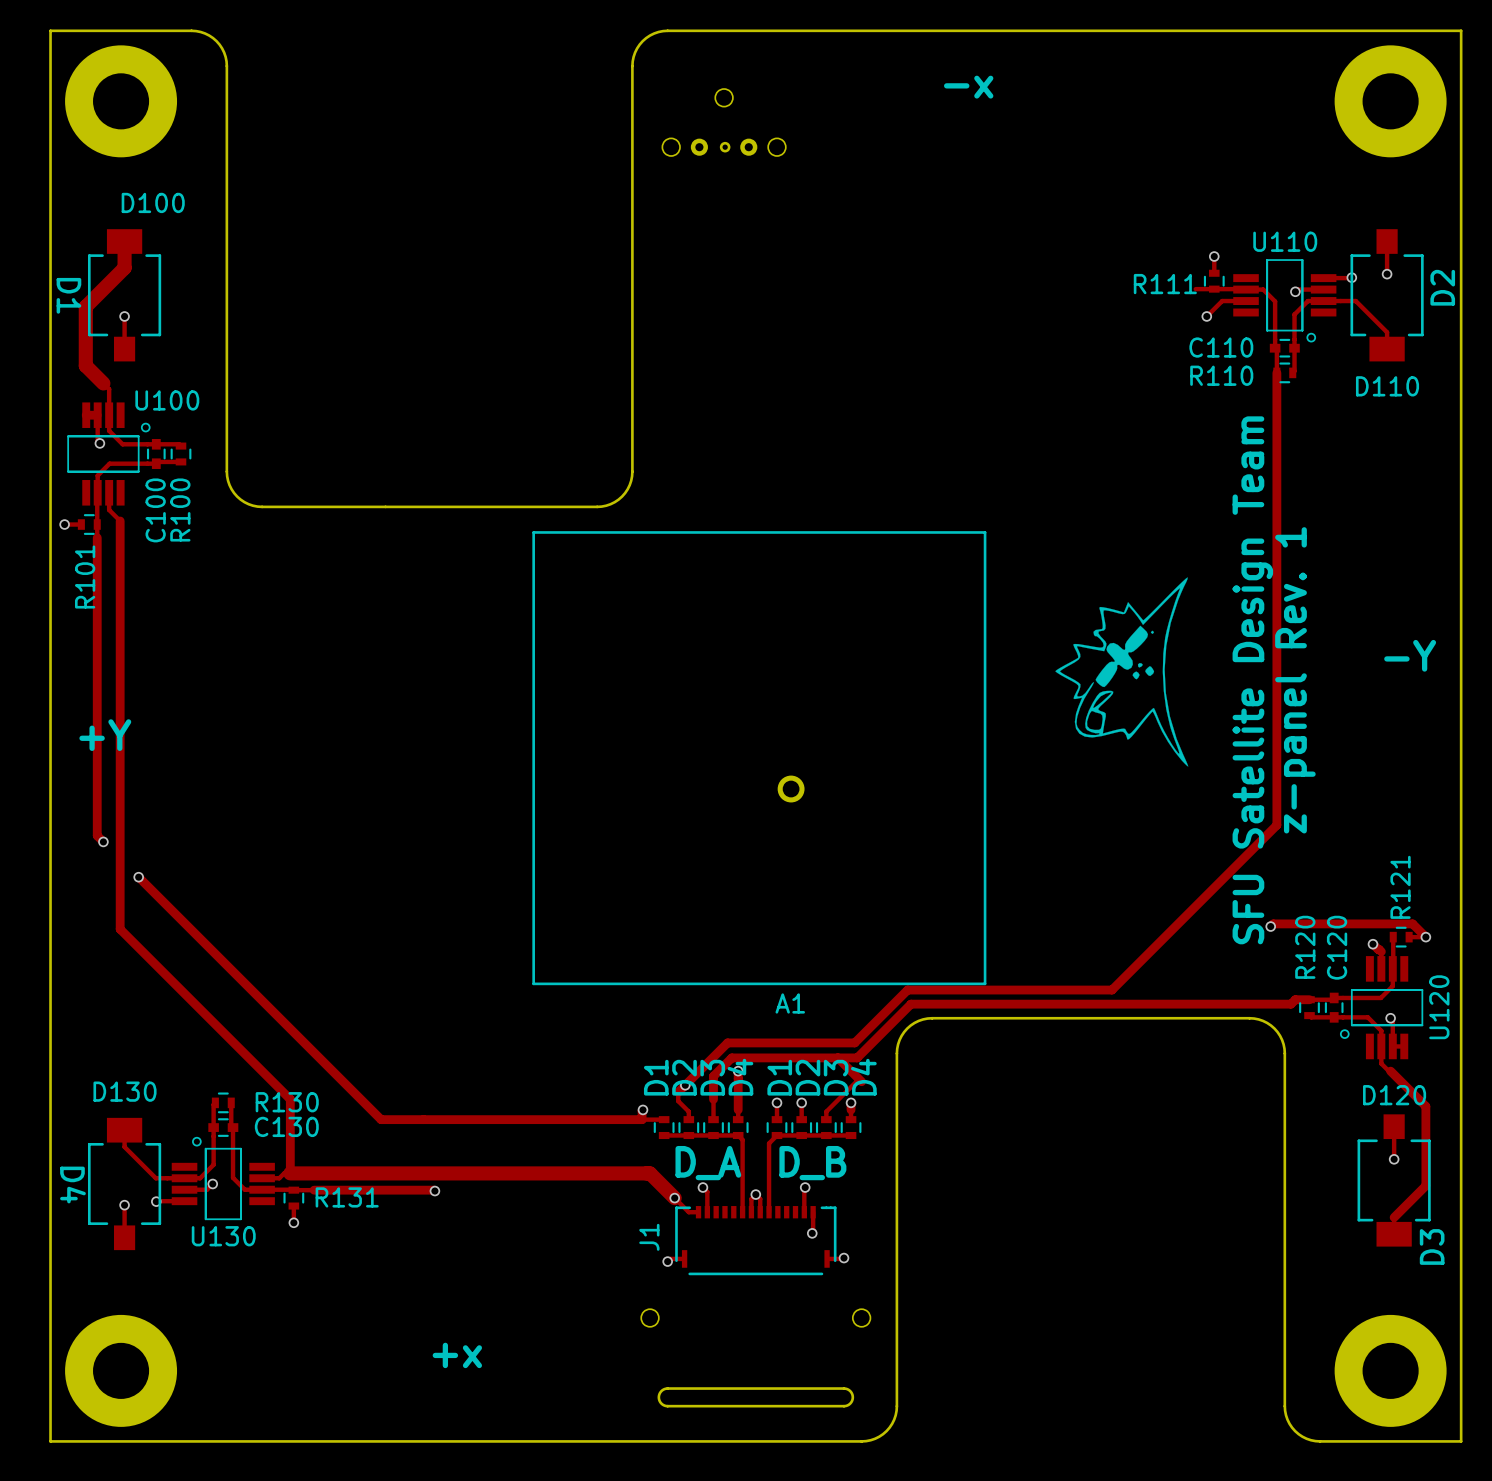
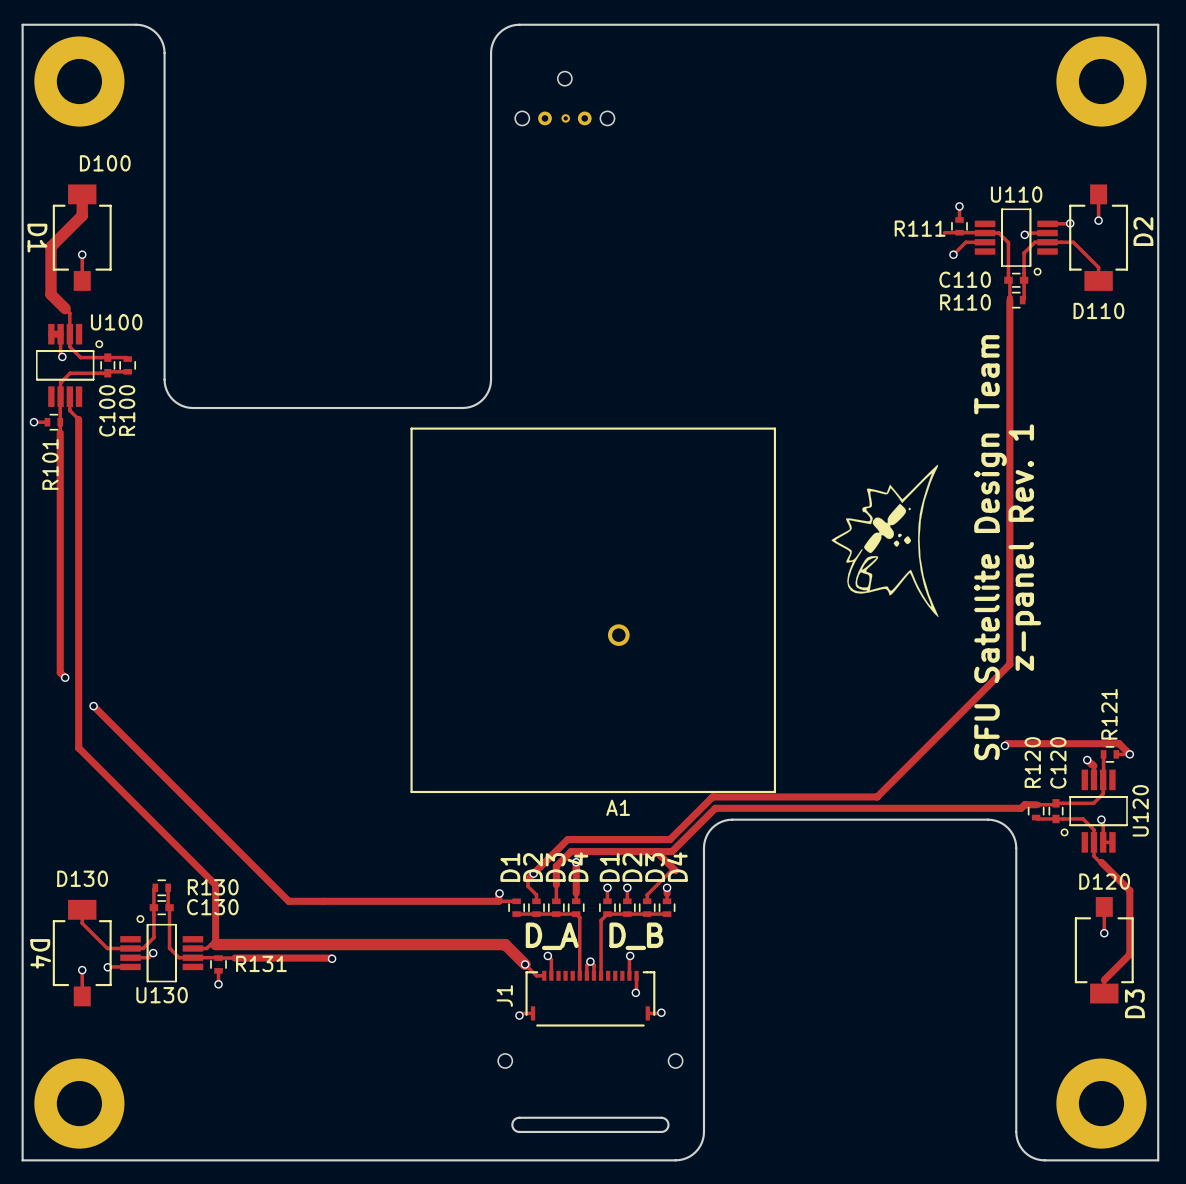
text: -x (968, 87) -> none
text: -Y (1410, 655) -> none
text: +Y (105, 735) -> none
text: +x (457, 1355) -> none

